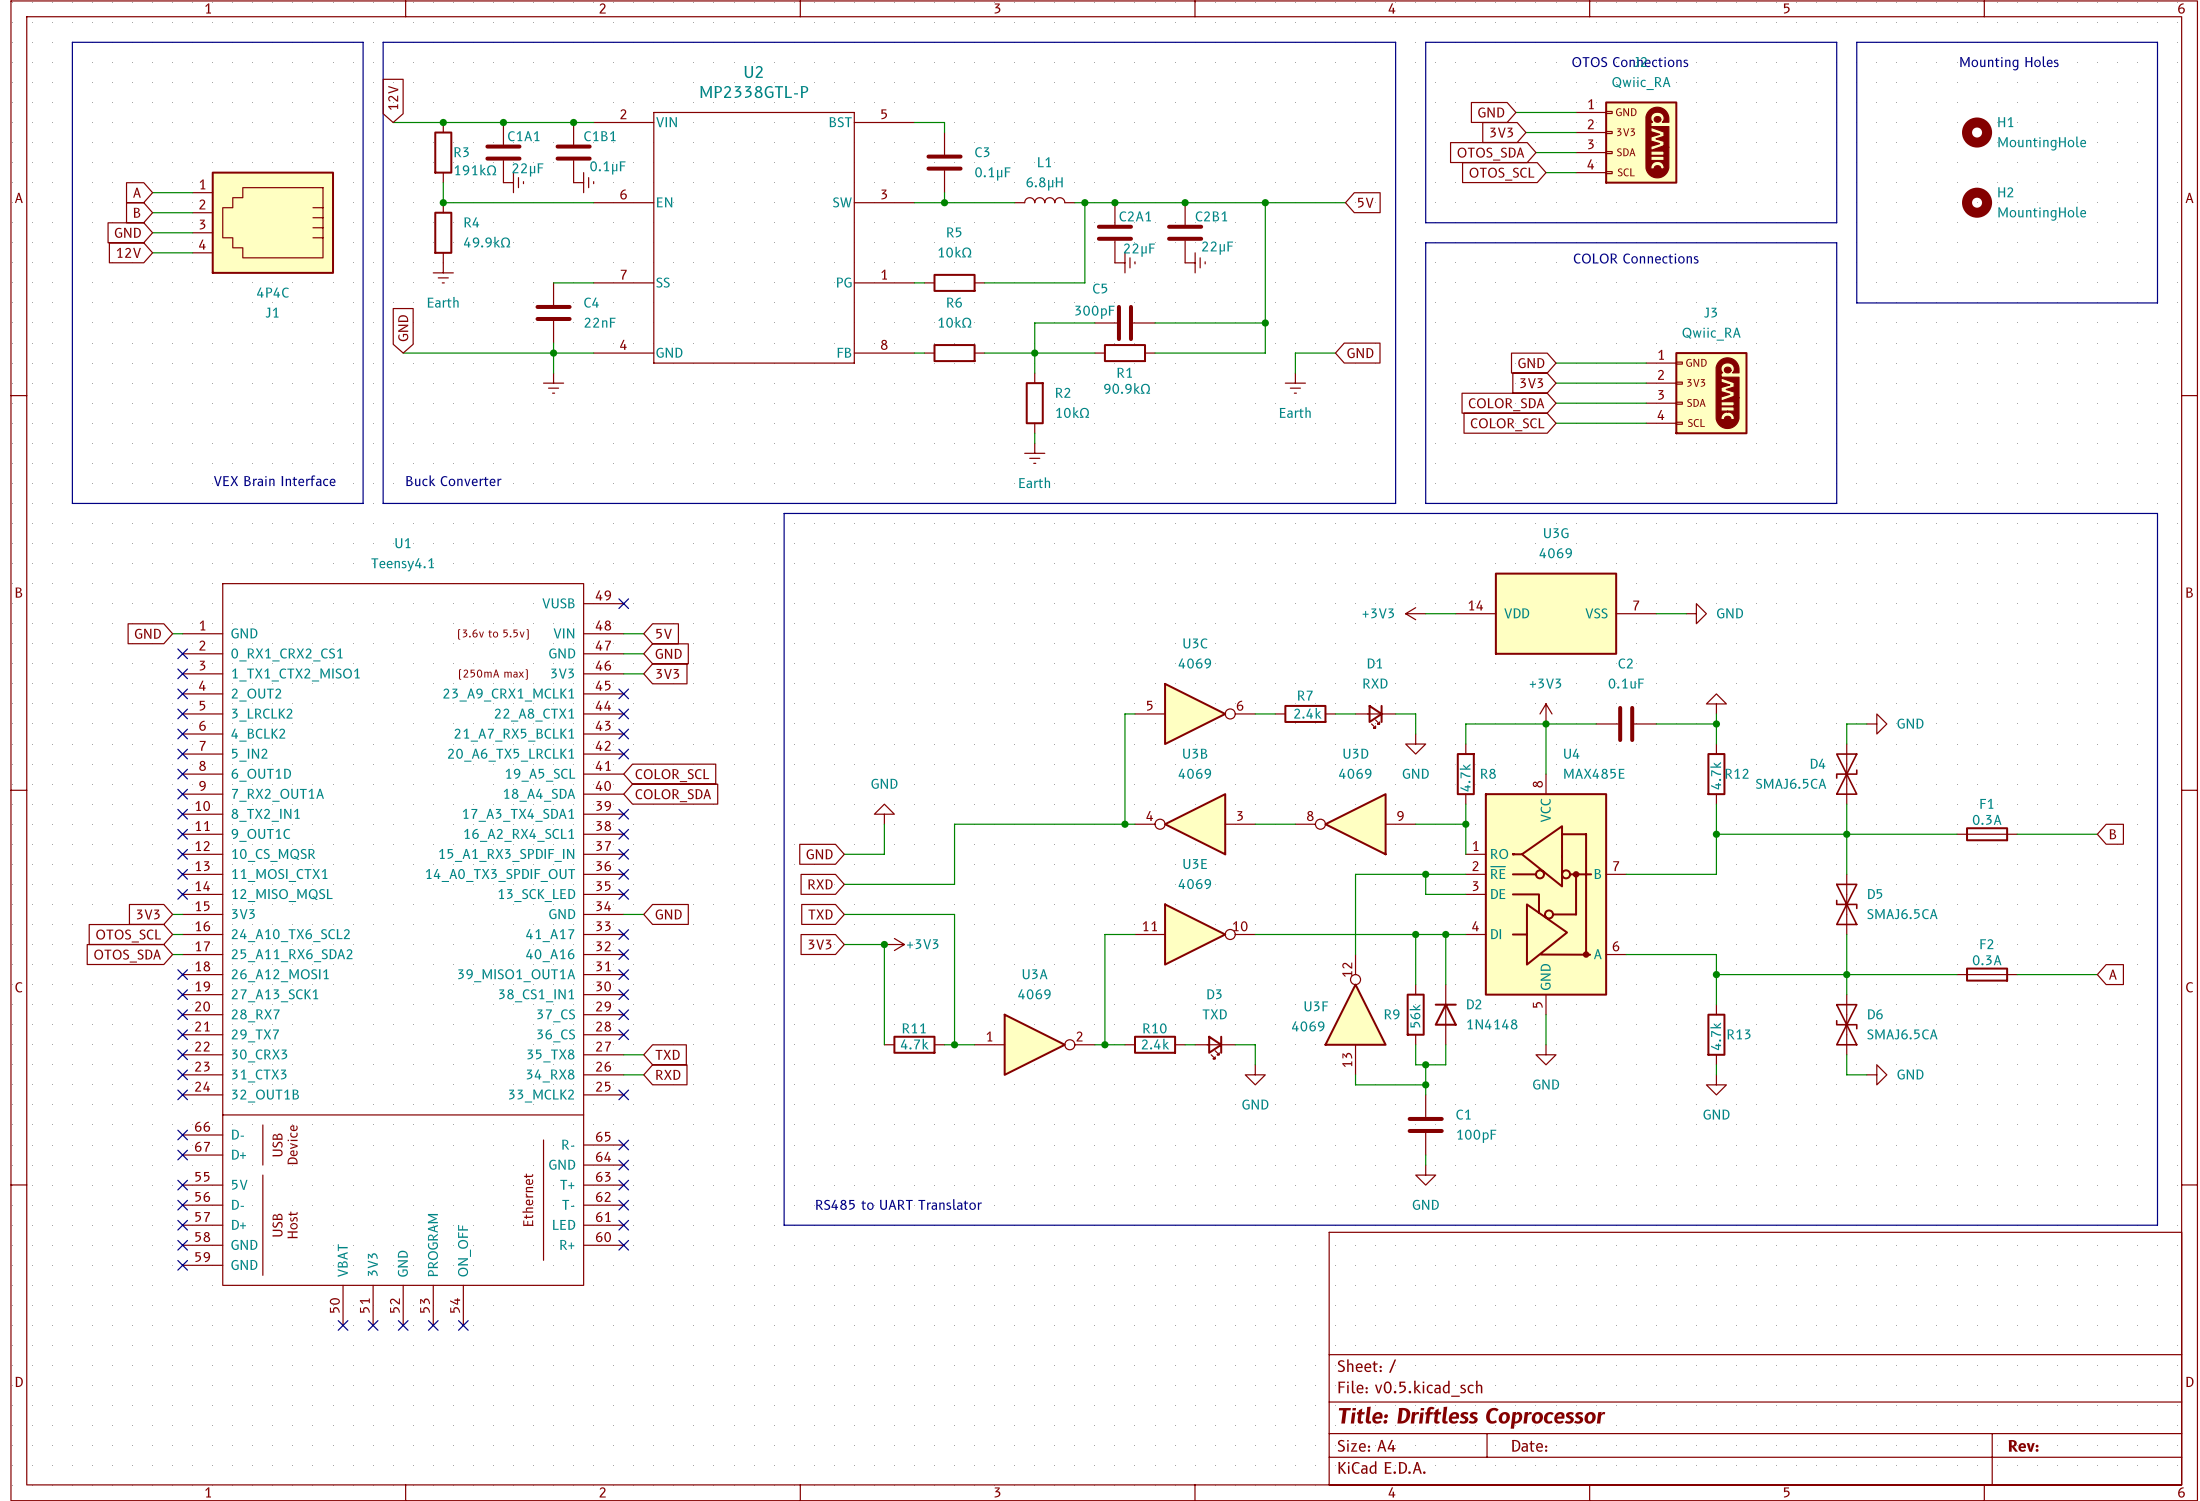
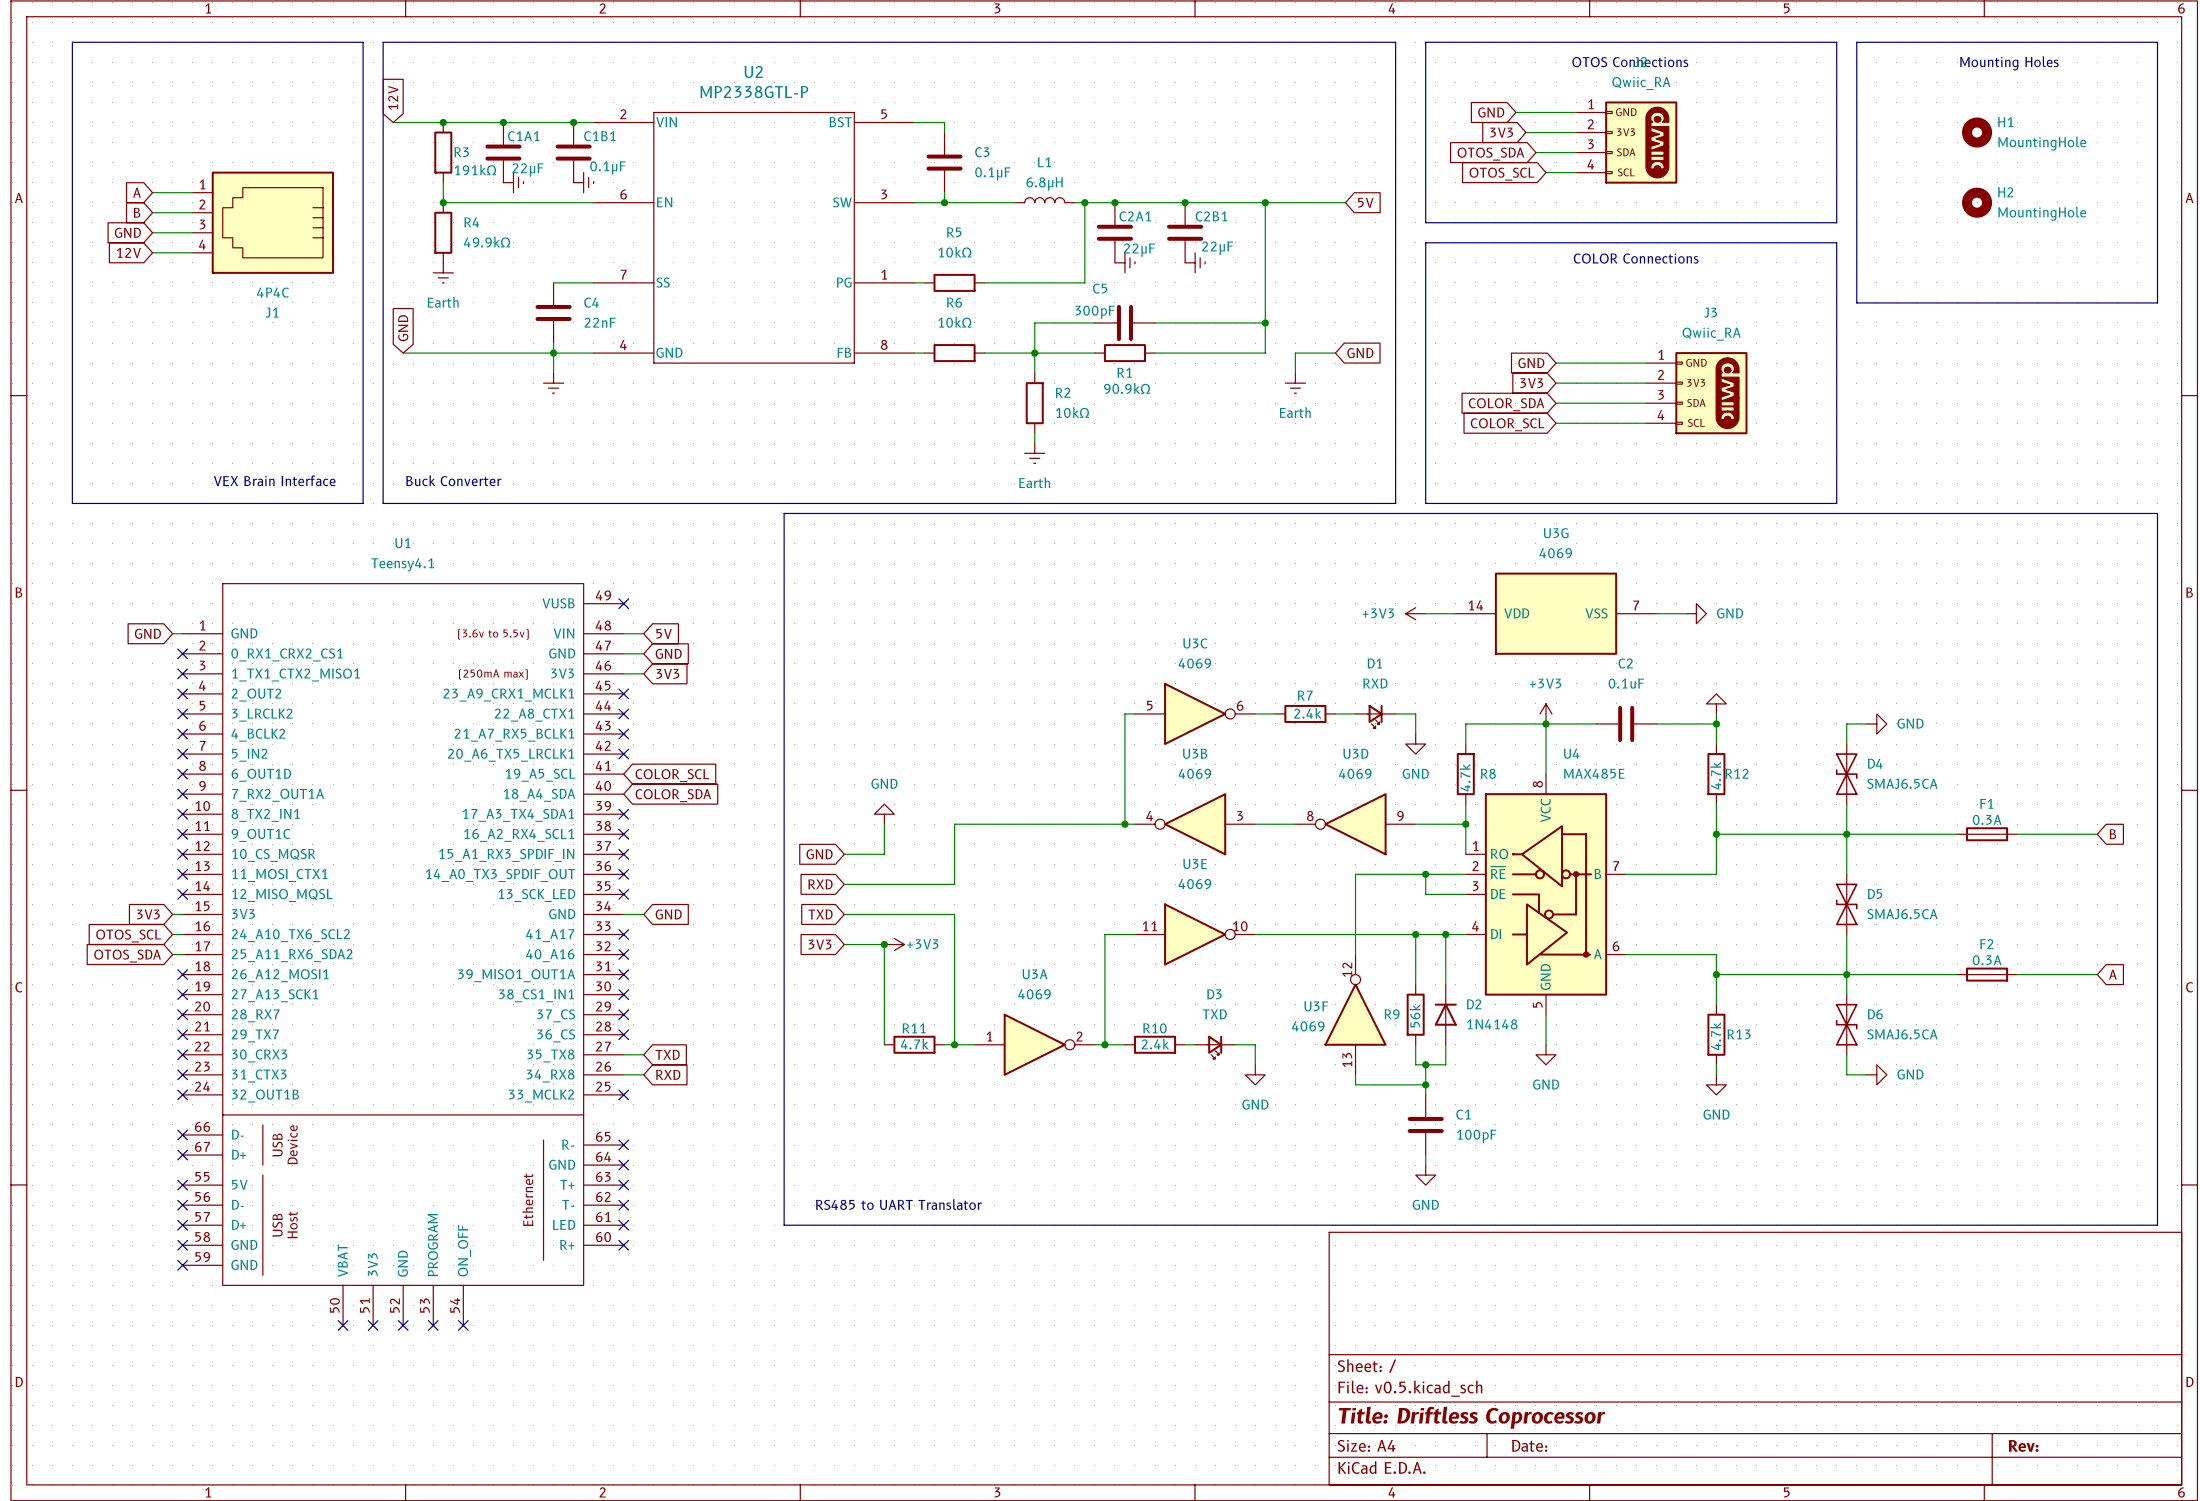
D4 flip: as is (1846, 774) -> left-right (1846, 774)

